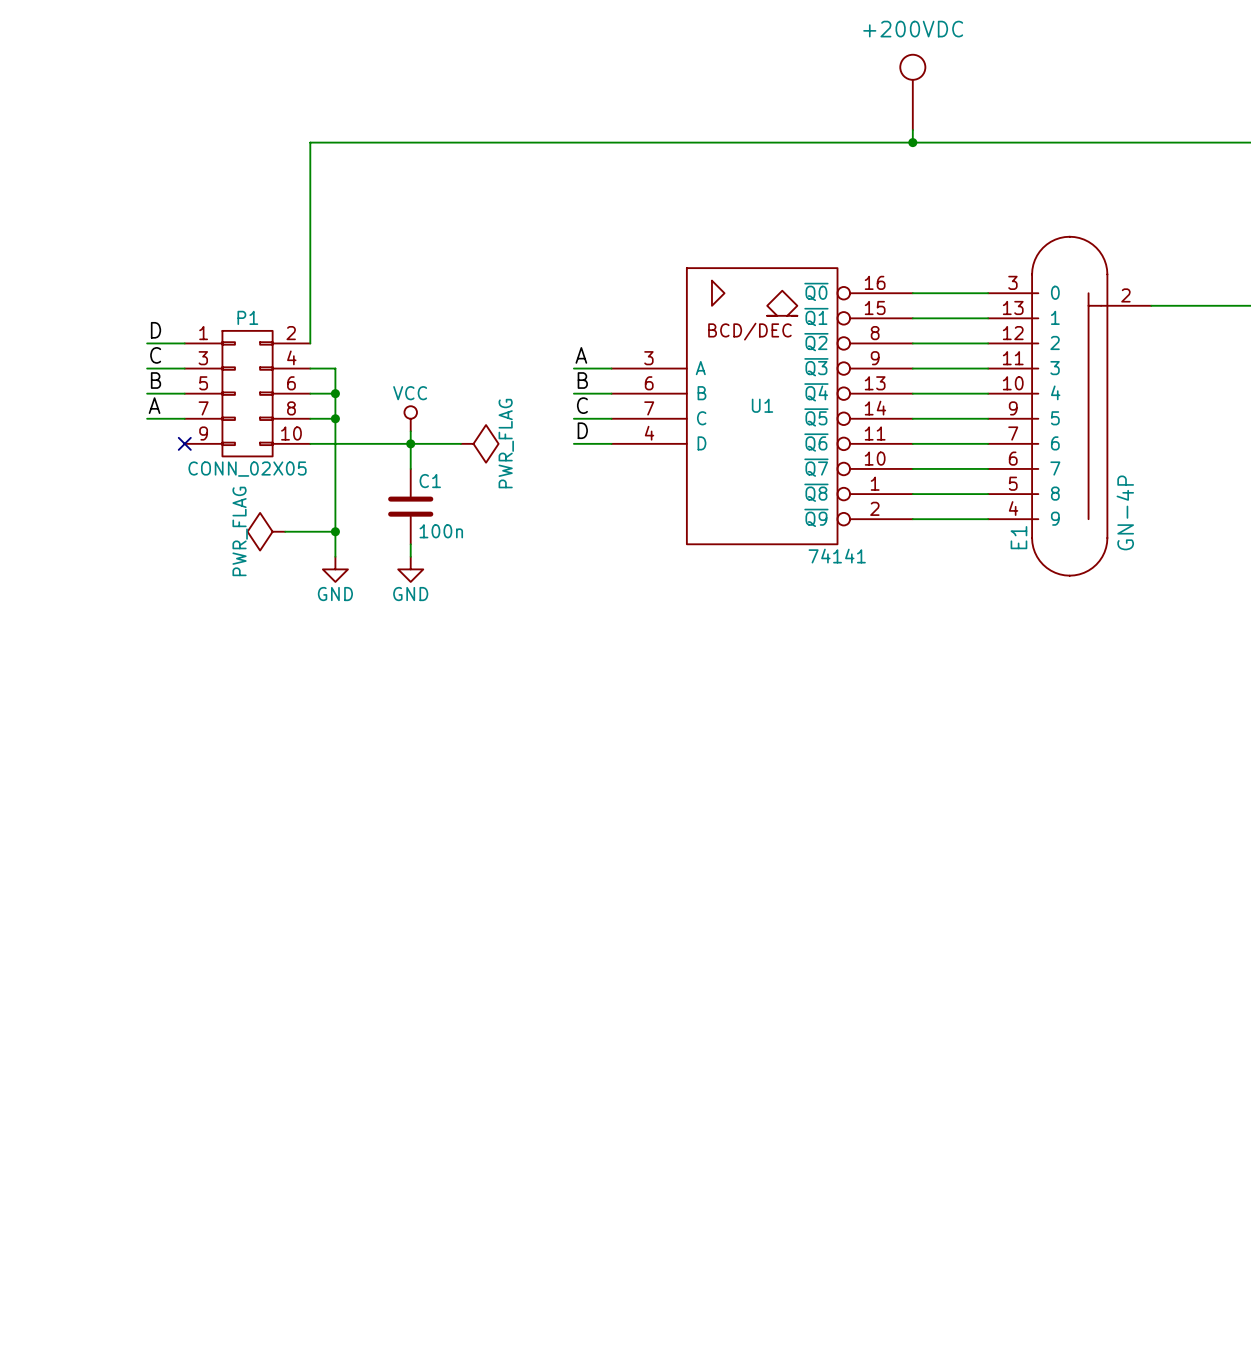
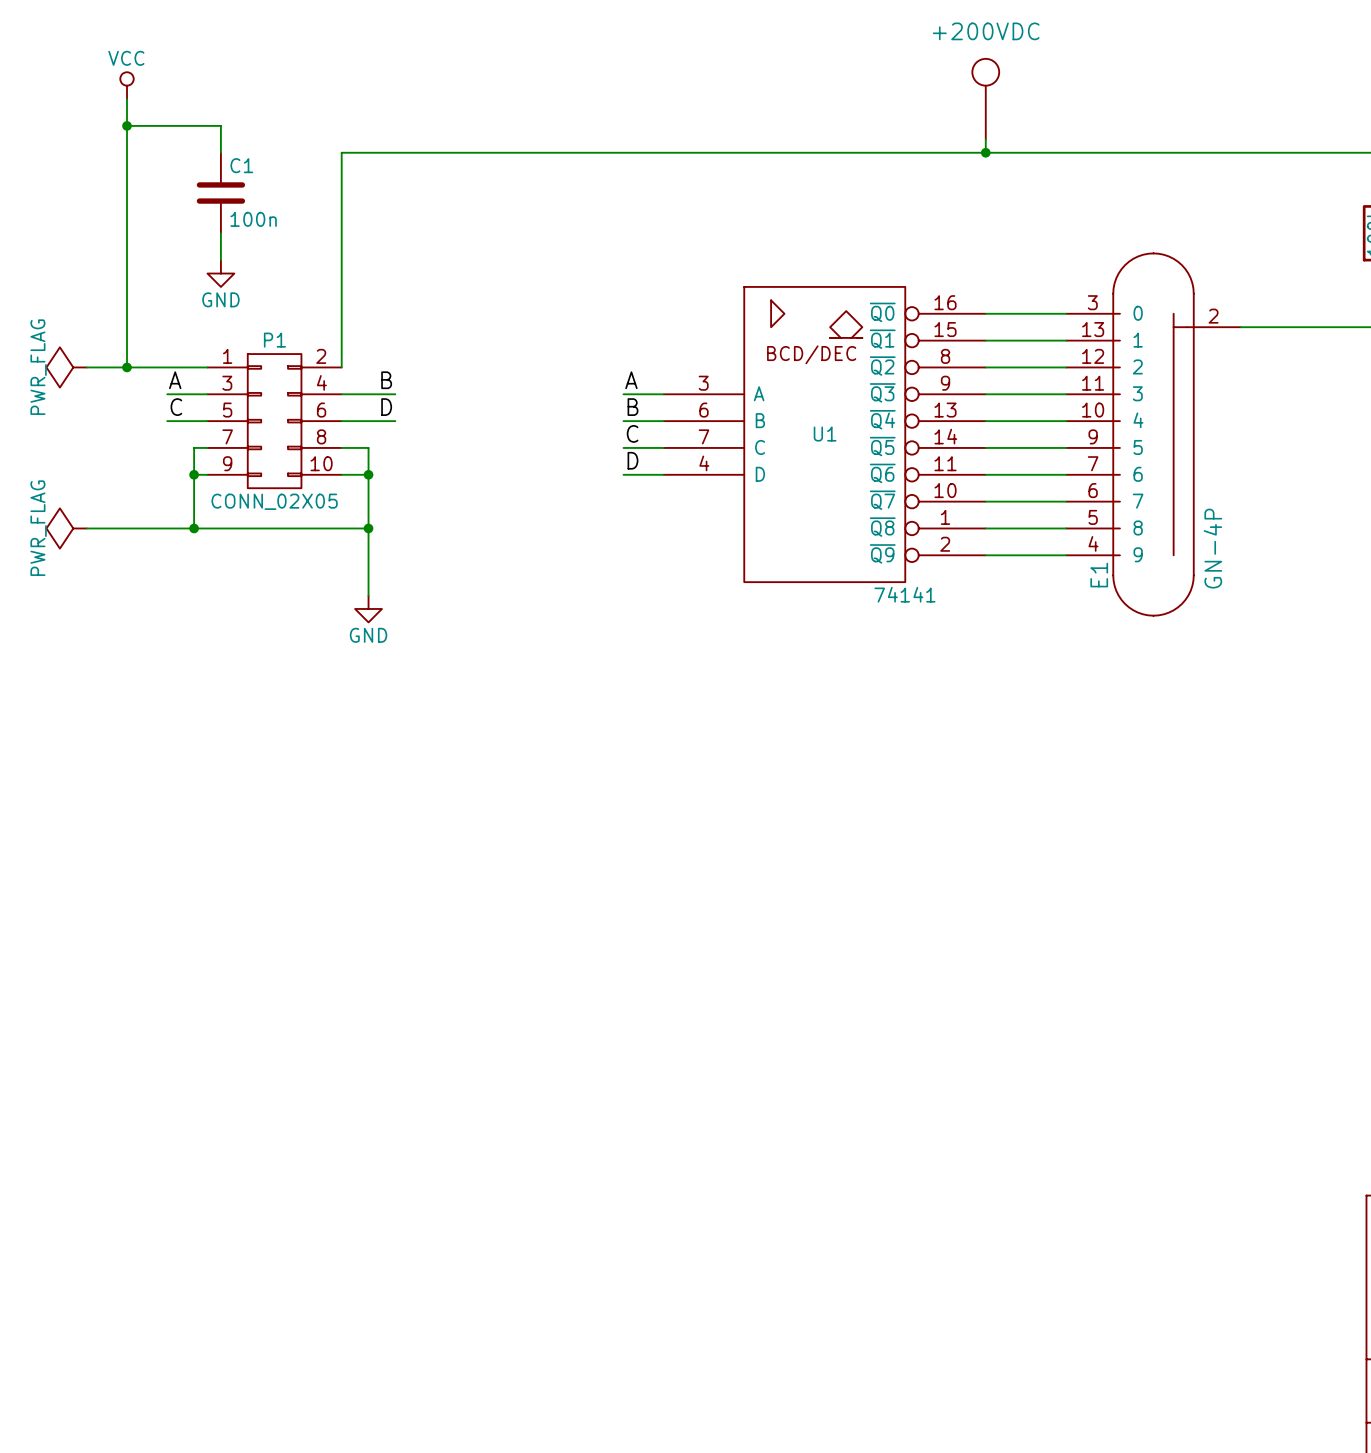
power symbol: none -> VCC (127, 85)
wire: none -> (127, 99) (127, 367)
wire: none -> (127, 125) (220, 125) (220, 152)
junction: none -> (127, 125)
wire: none -> (220, 233) (220, 260)
power symbol: none -> GND (220, 273)
label position: D (156, 330) -> D (386, 407)
power symbol: none -> PWR_FLAG (66, 367)
wire: none -> (86, 367) (167, 367)
junction: none -> (127, 367)
label: C (155, 355) -> A (175, 380)
label: none -> B (386, 380)
wire: (335, 368) (335, 418) -> (368, 394) (395, 394)
label: B (156, 380) -> C (176, 407)
wire: none -> (368, 421) (395, 421)
junction: (335, 393) -> none
label: A (154, 405) -> none
wire: (147, 418) (172, 418) -> (194, 528) (194, 447)
junction: (335, 418) -> none
power symbol: VCC (410, 418) -> none
wire: (410, 431) (410, 468) -> none
wire: none -> (194, 474) (207, 474)
junction: none -> (194, 474)
no-connect mark: (184, 443) -> none
wire: (335, 443) (460, 443) -> none
junction: none -> (368, 474)
junction: (410, 443) -> none
power symbol: PWR_FLAG (479, 443) -> none
power symbol: none -> PWR_FLAG (66, 528)
wire: none -> (86, 528) (368, 528)
junction: none -> (194, 528)
junction: none -> (368, 528)
C1 position: (410, 506) -> (220, 193)
power symbol: PWR_FLAG (266, 531) -> none
wire: (285, 531) (335, 531) -> none
junction: (335, 531) -> none
wire: (410, 544) (410, 556) -> none
power symbol: GND (410, 569) -> none

